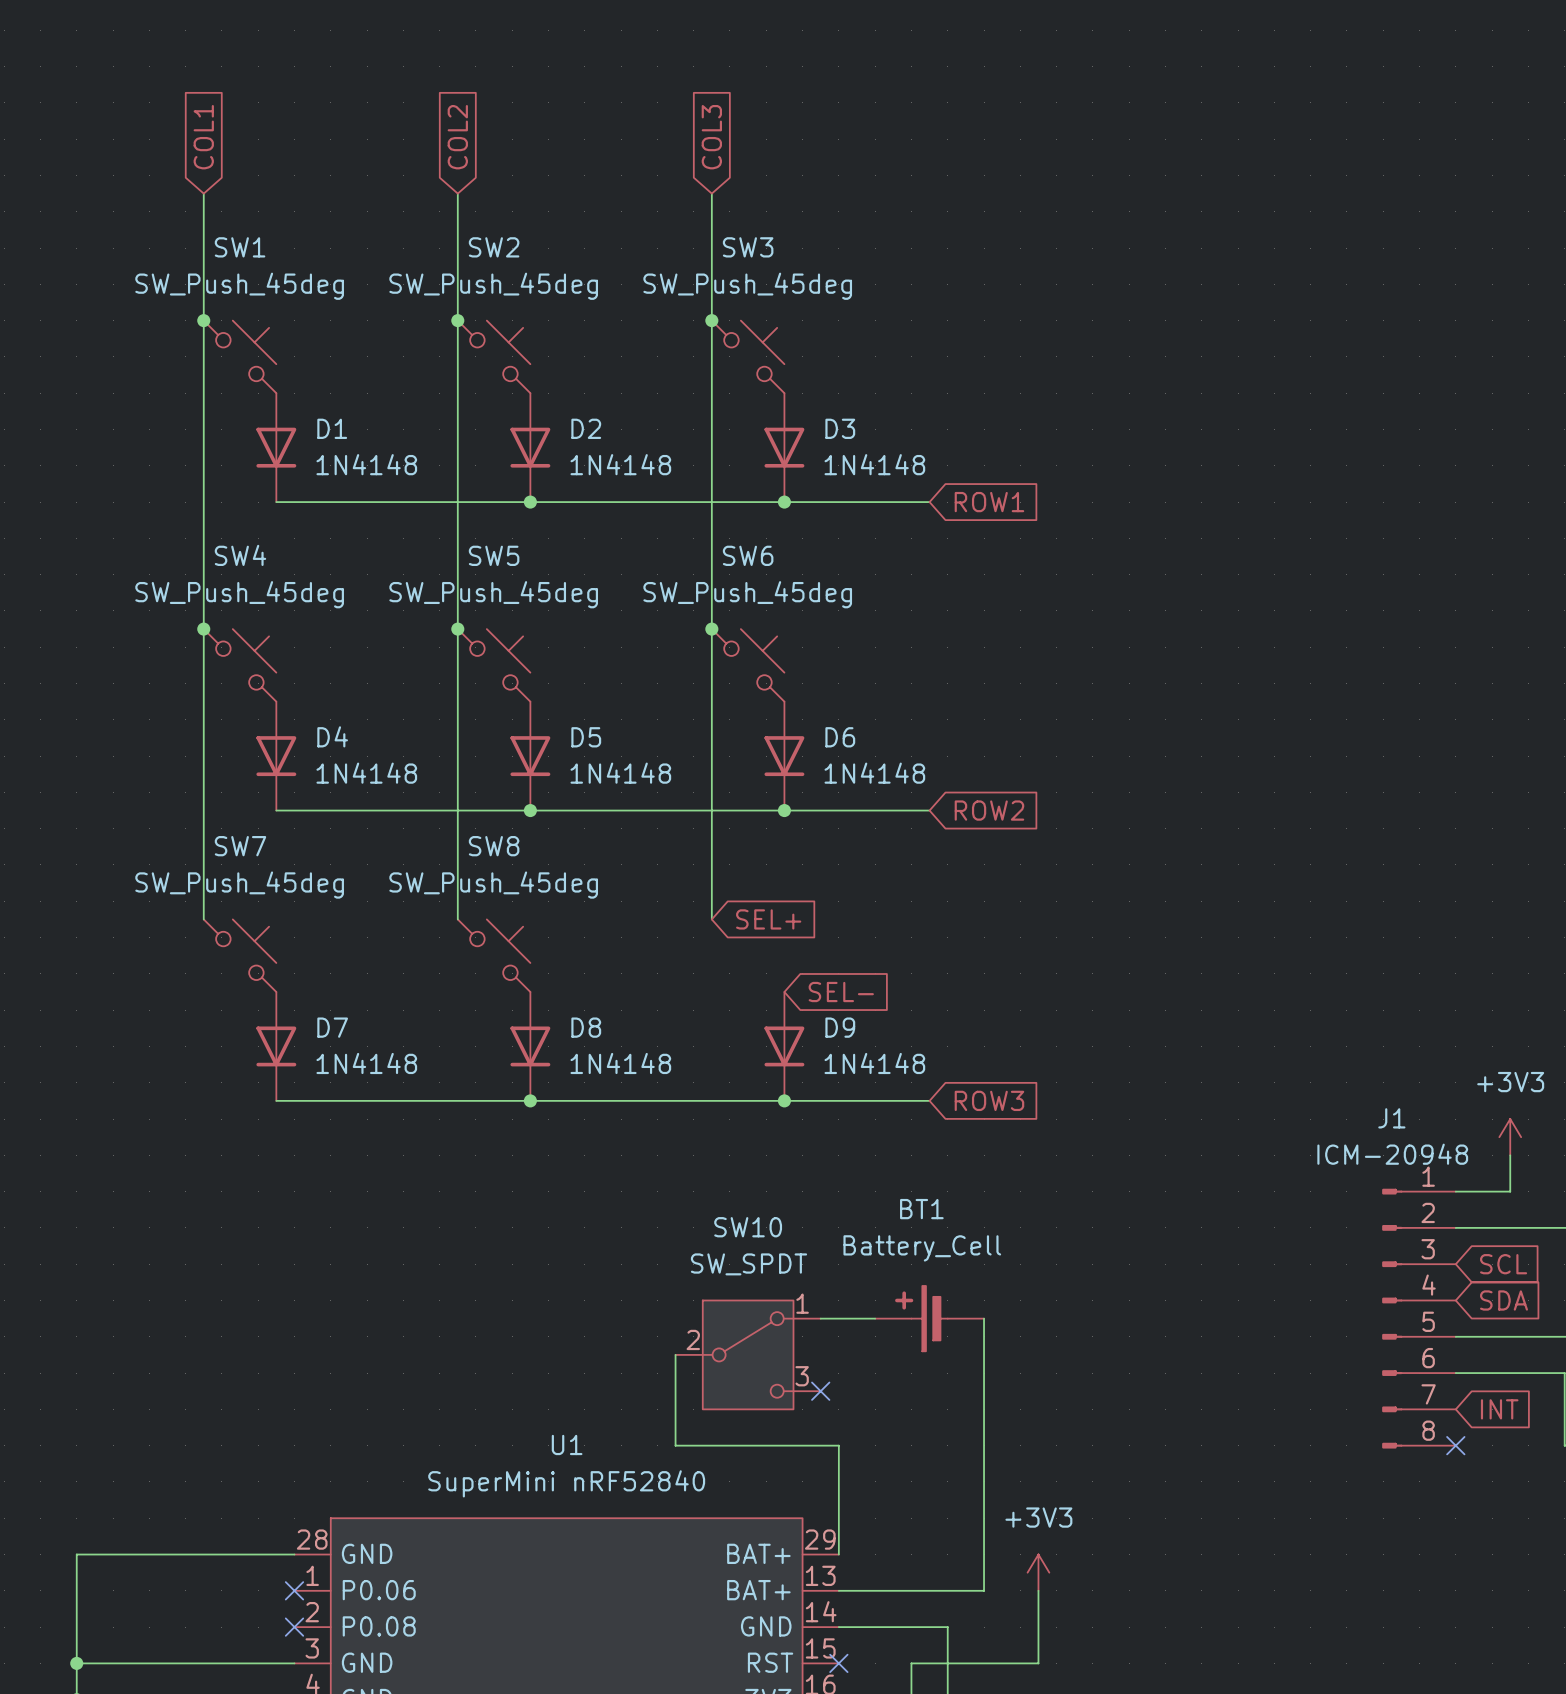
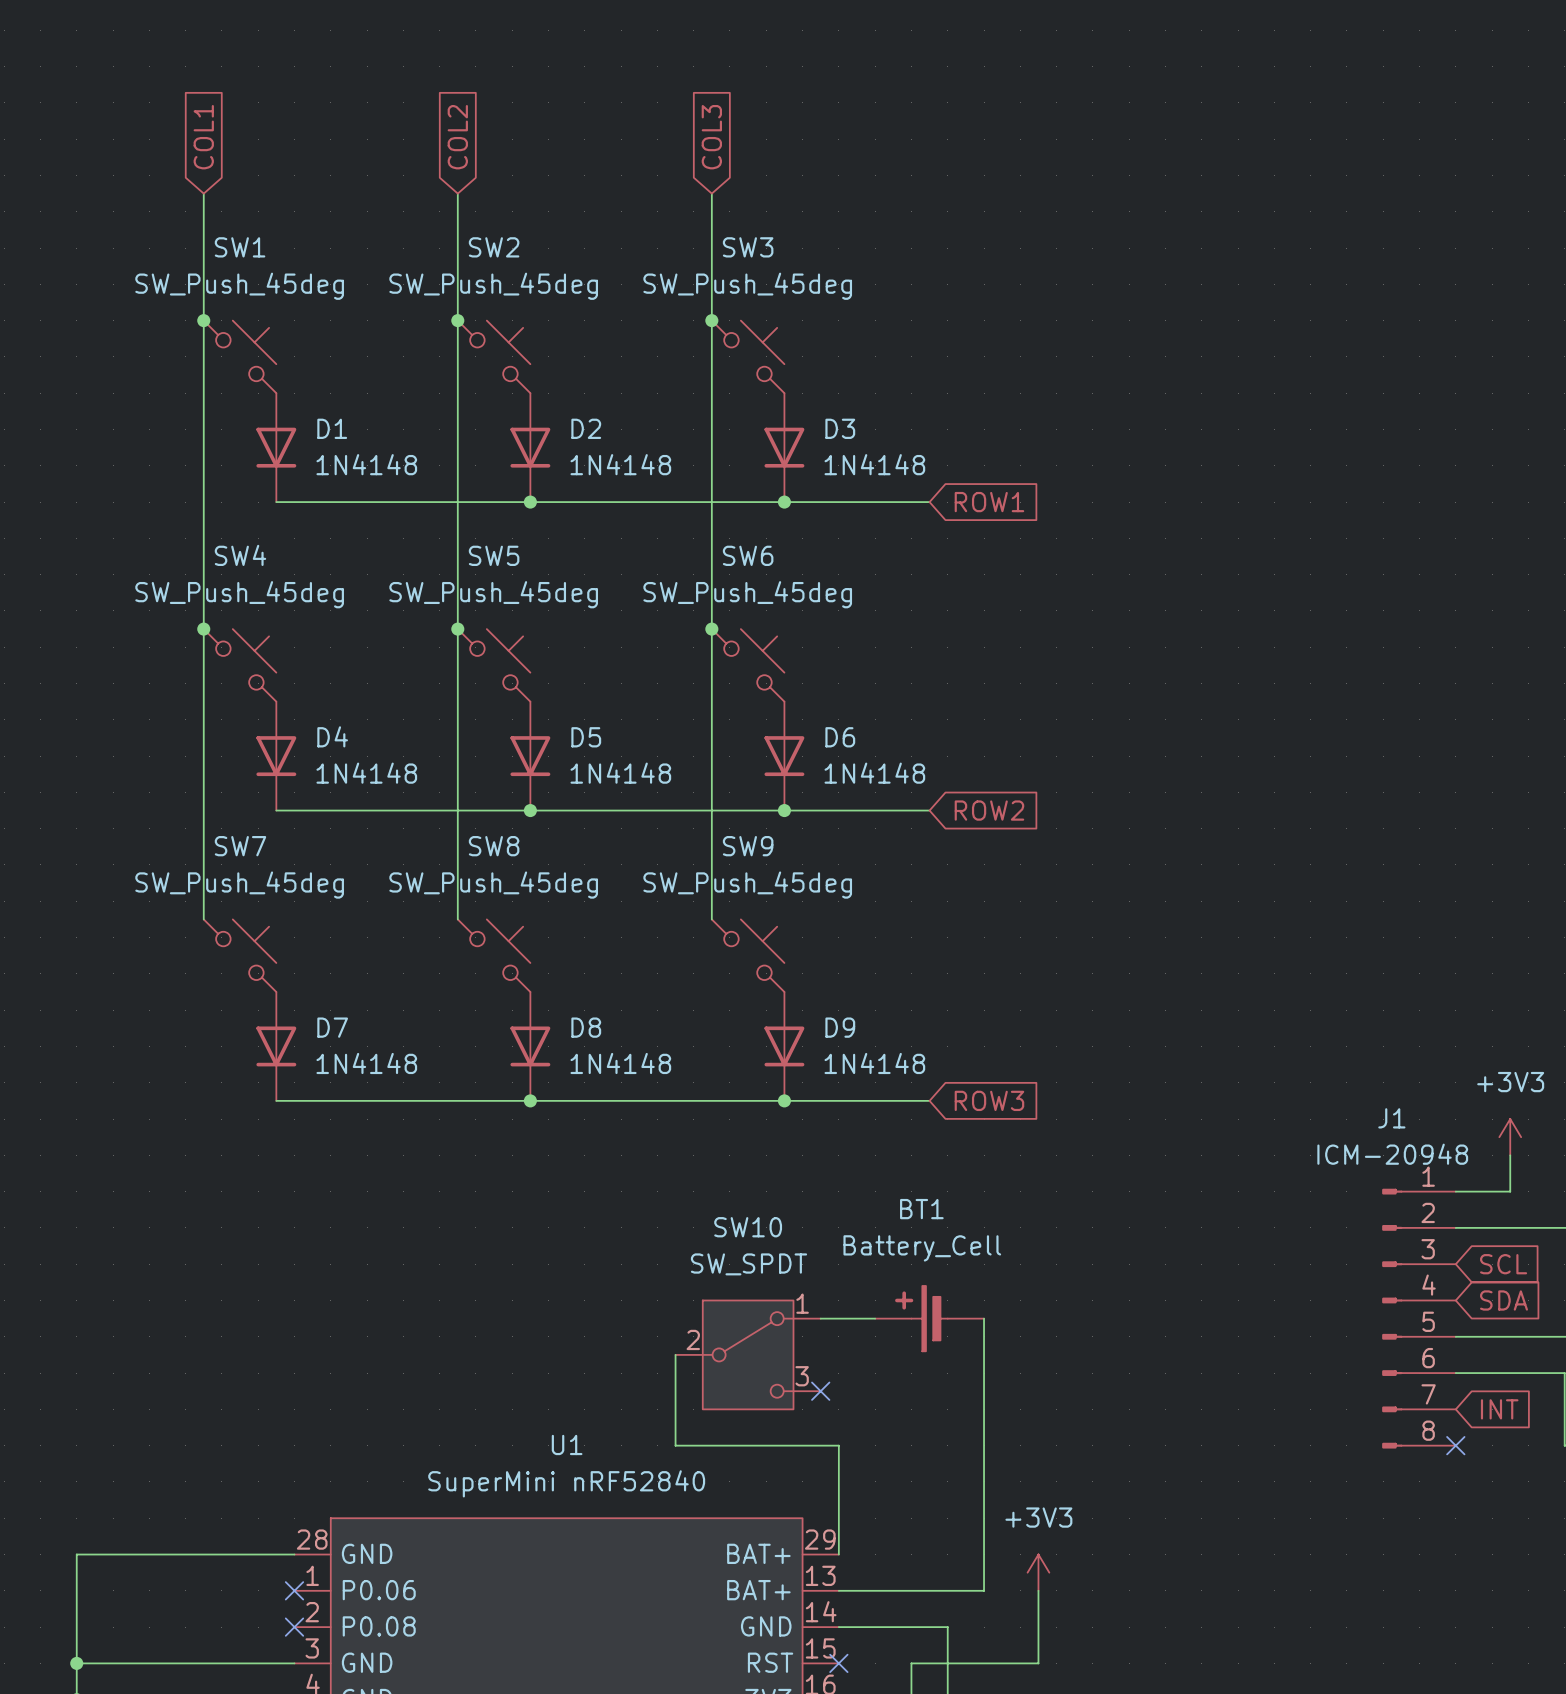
global label: SEL+ (768, 919) -> none
SW9: none -> SW_Push_45deg (748, 955)
global label: SEL- (841, 992) -> none

